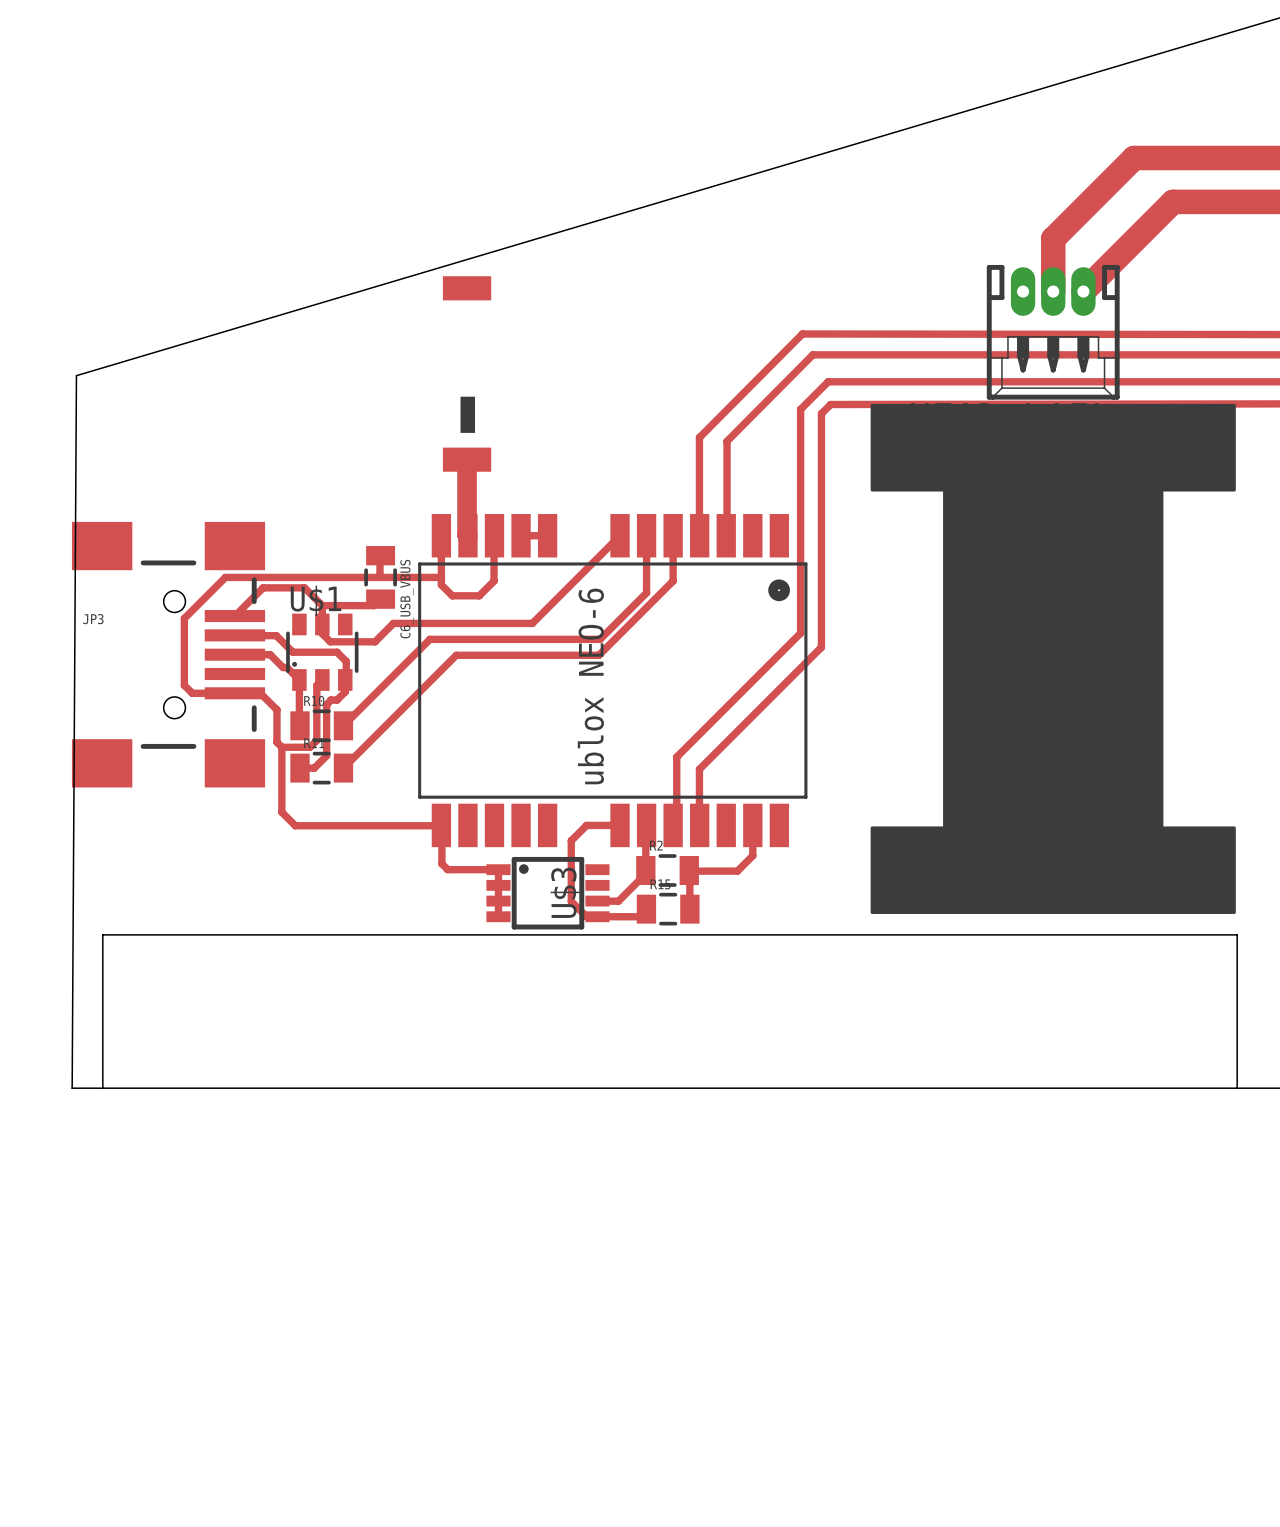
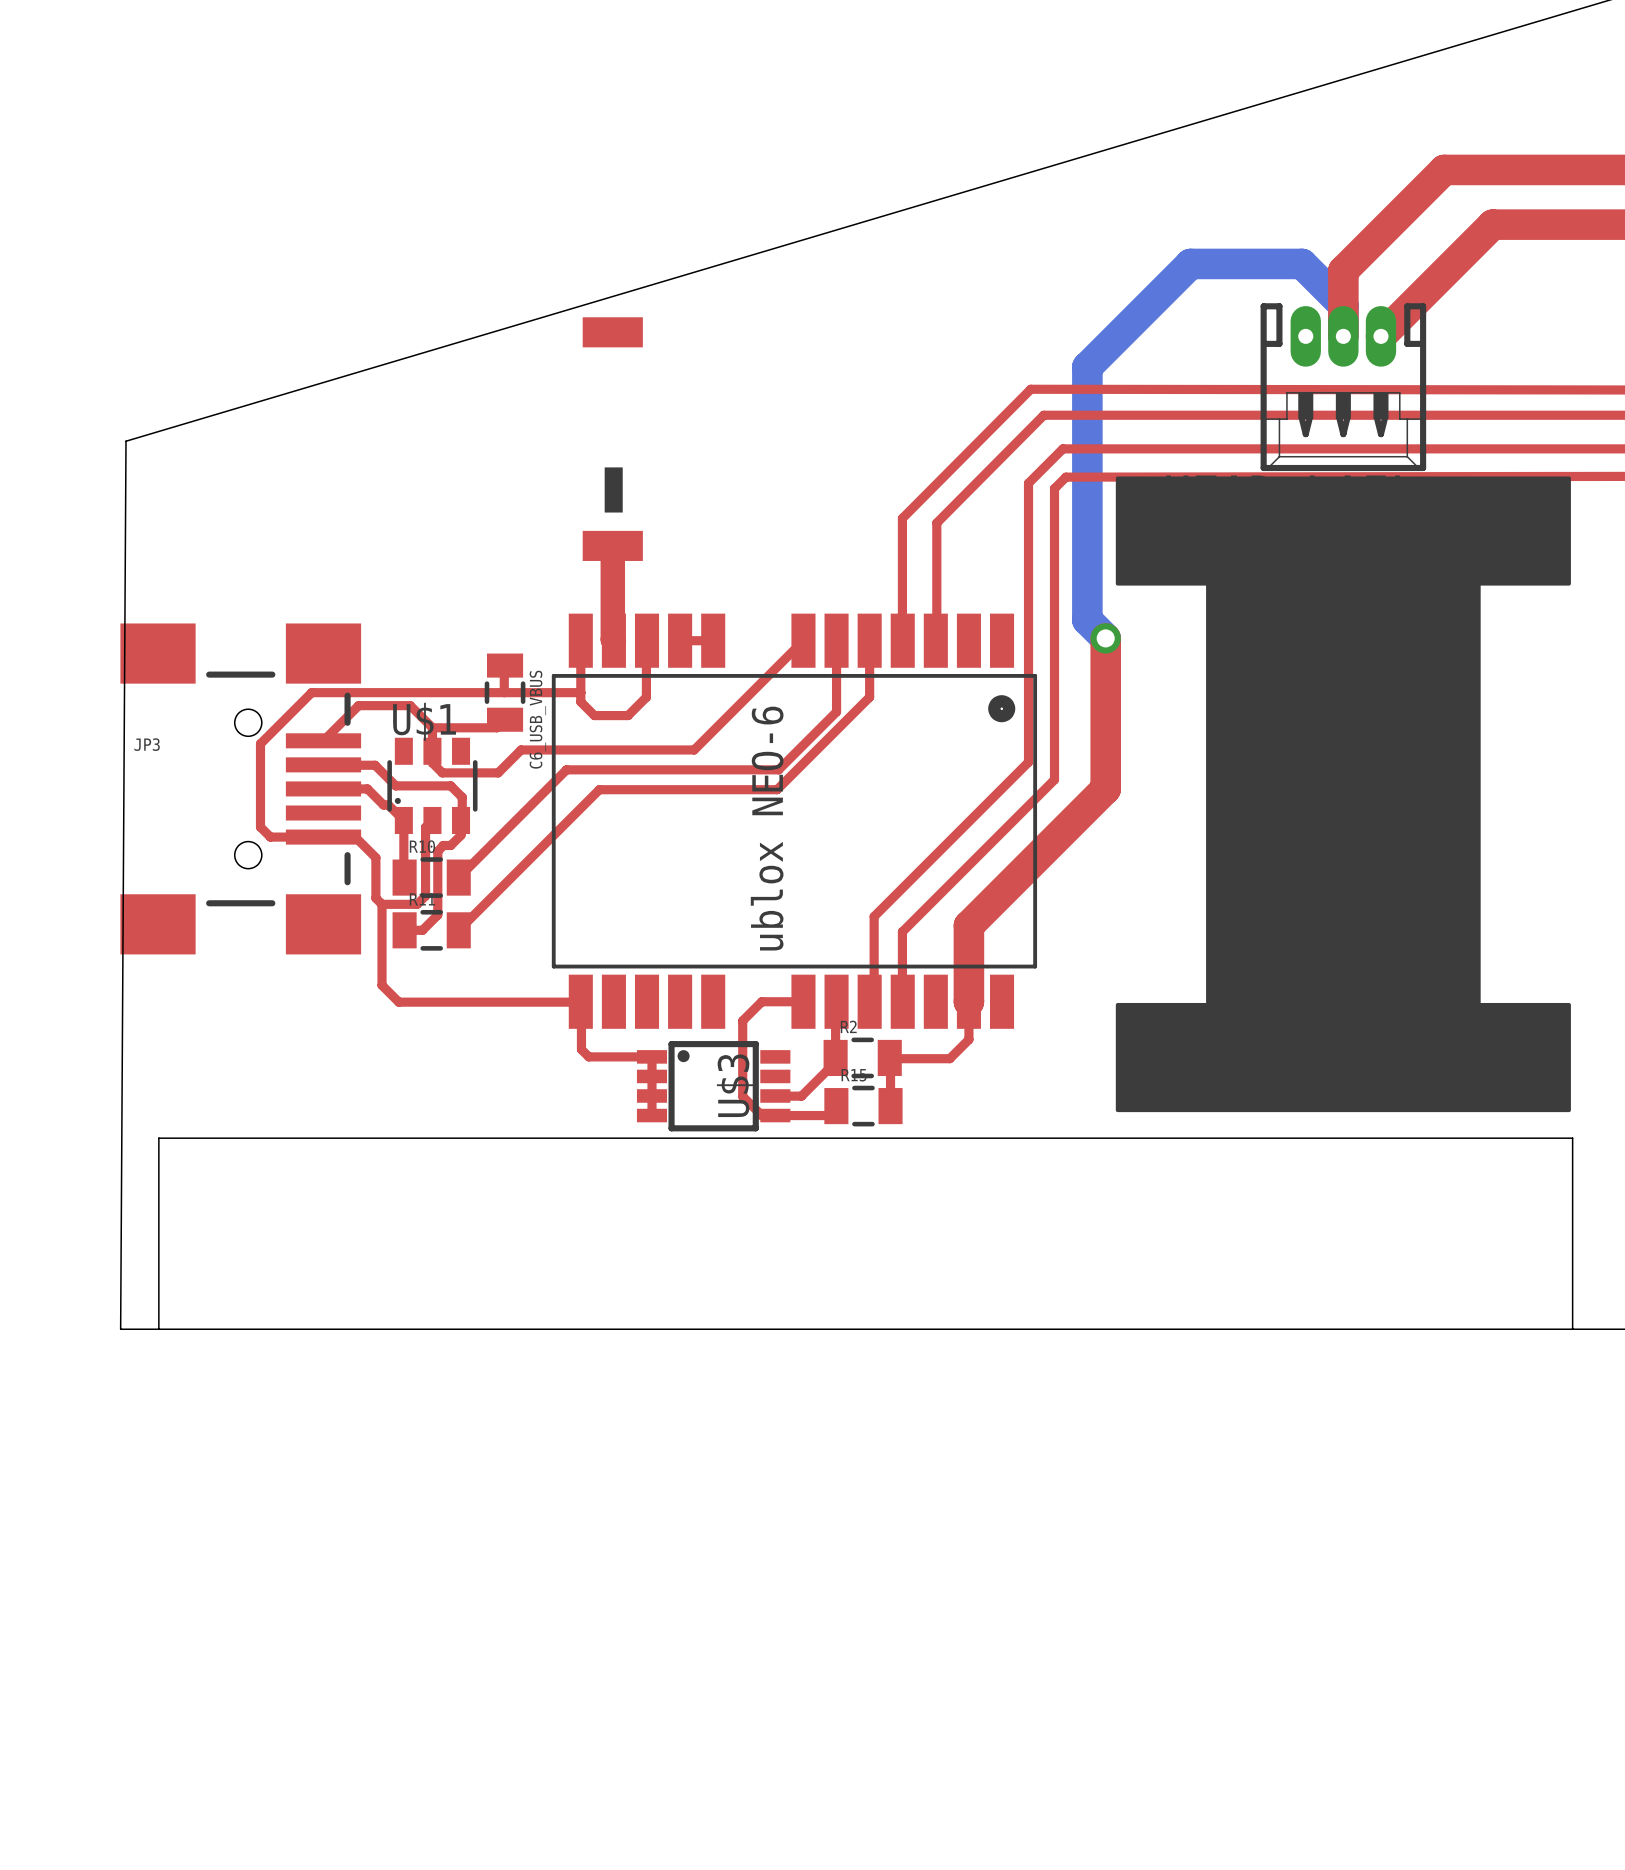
bottom track: none -> (1343, 336) (1343, 305) (1302, 263) (1190, 263) (1087, 367) (1087, 620) (1105, 638)
top track: none -> (1105, 638) (1105, 788) (968, 925) (968, 1001)
via: none -> (1105, 638)

